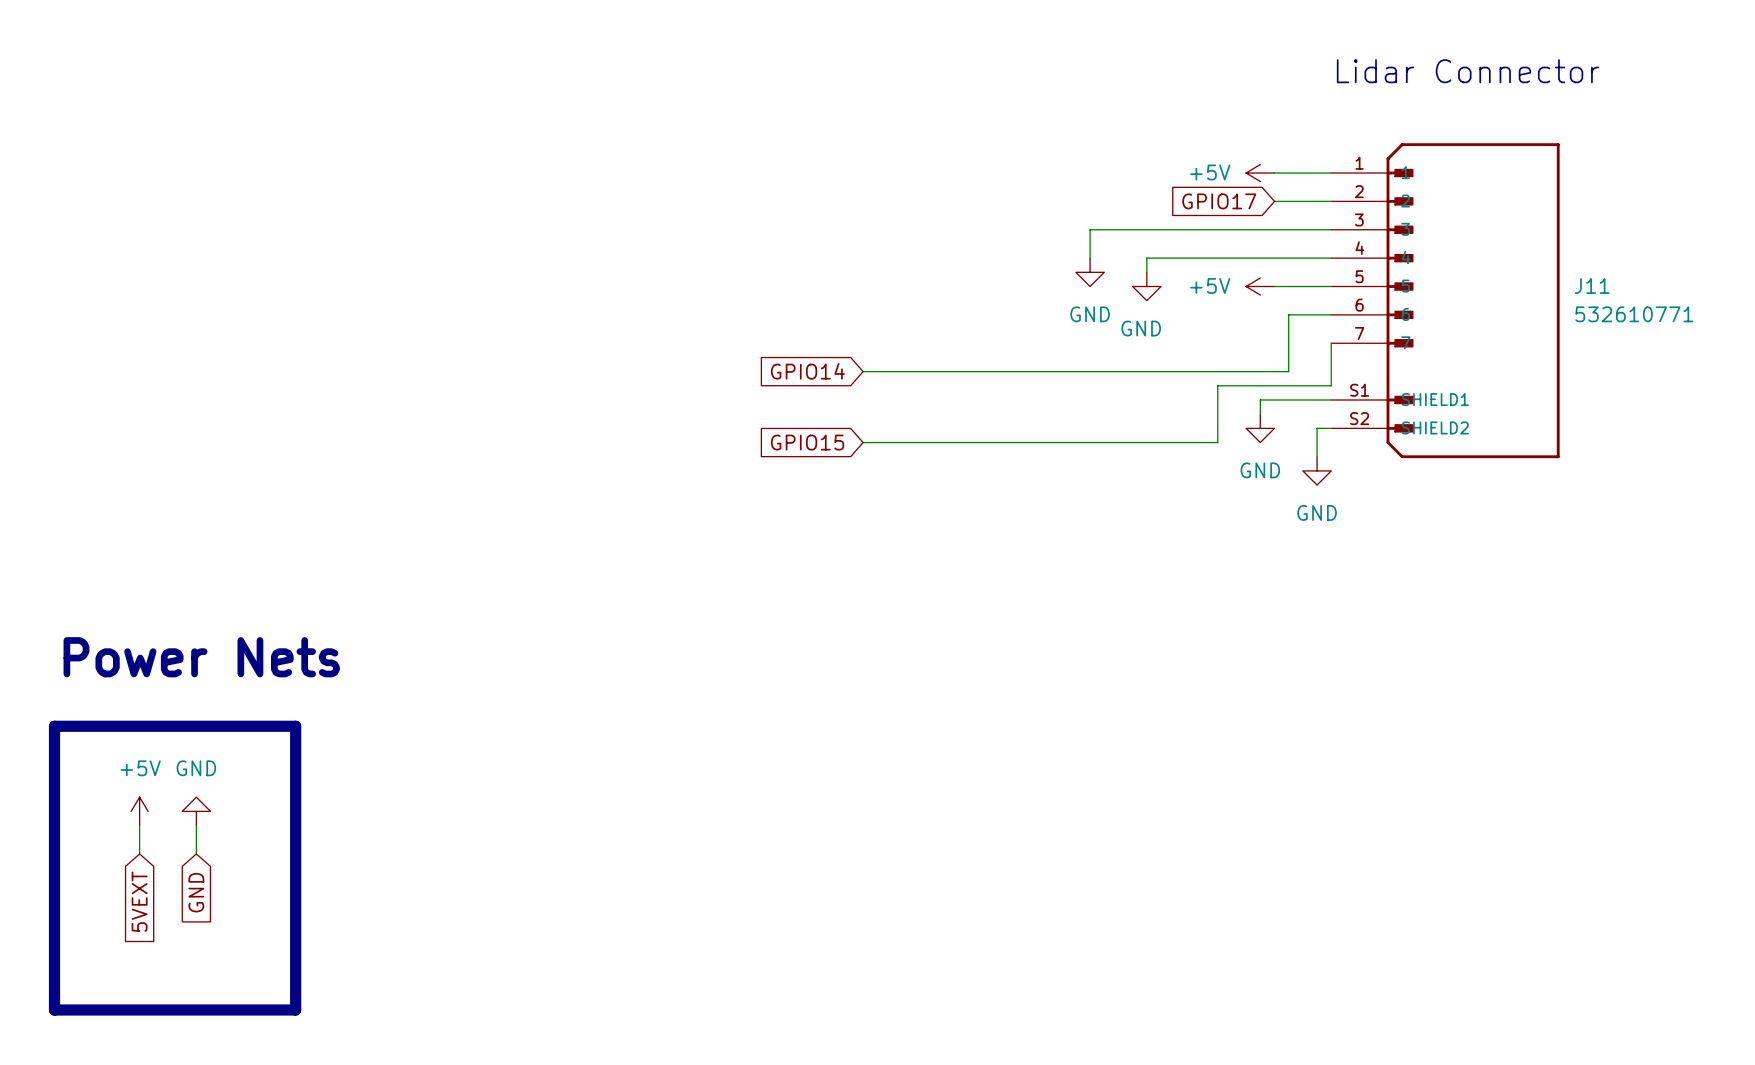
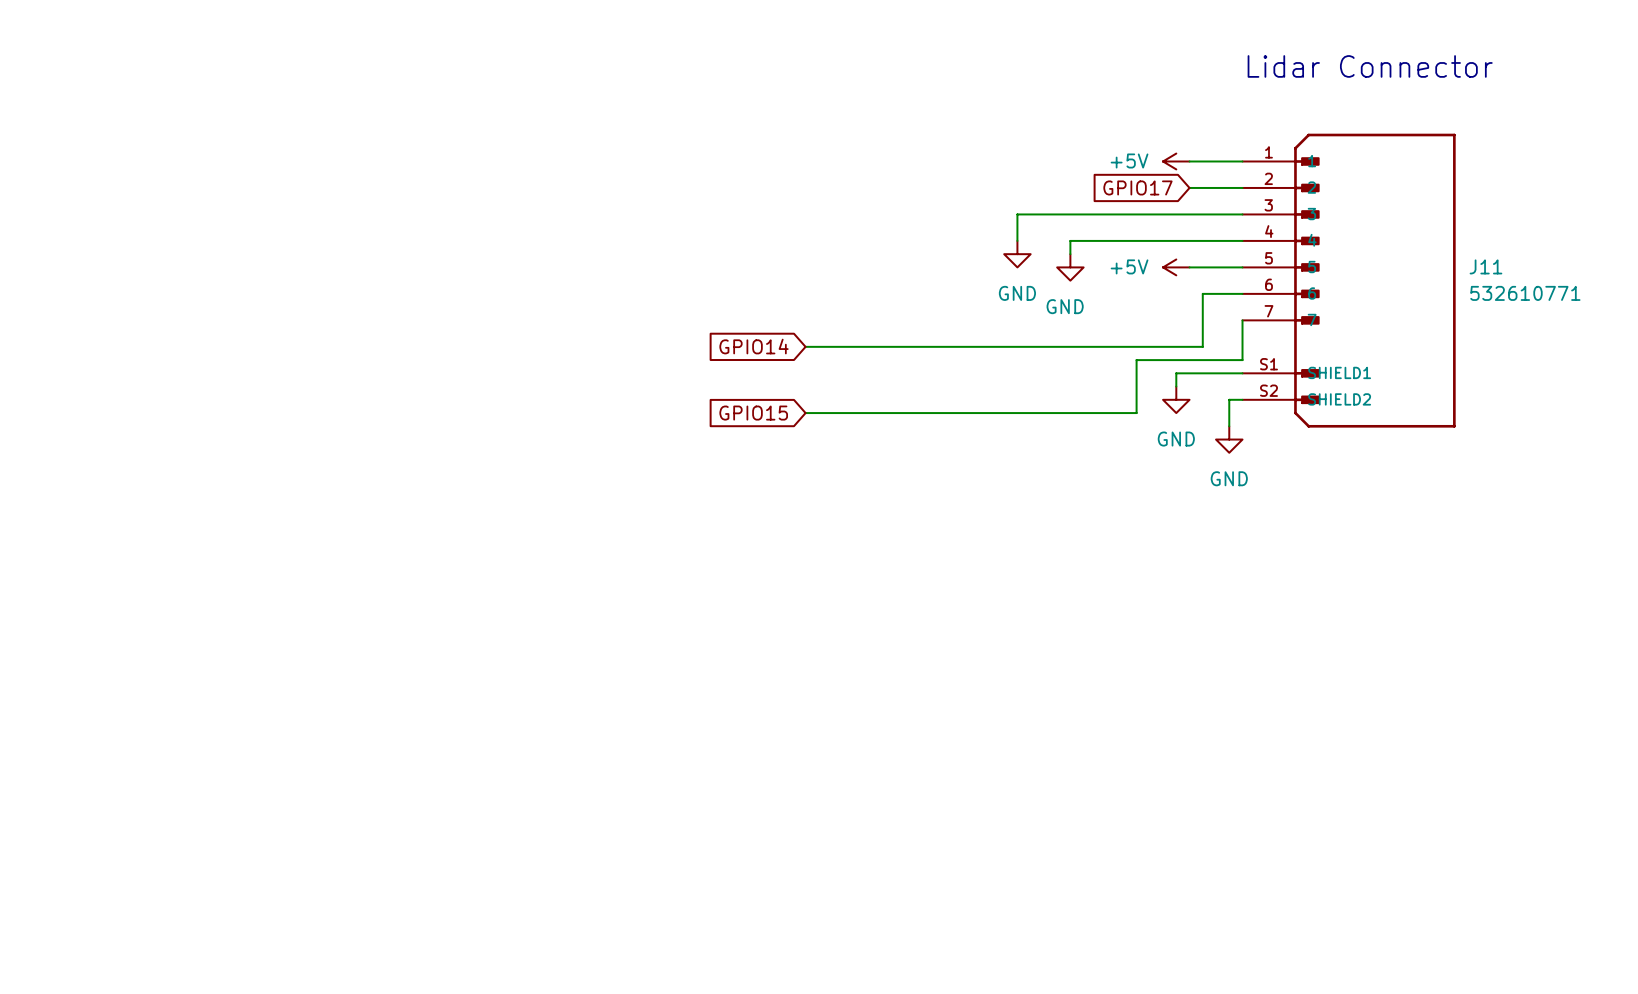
text: Power Nets (201, 657) -> none
line: (54, 726) (295, 726) (295, 1010) (54, 1010) (54, 726) -> none
power symbol: +5V (139, 811) -> none
power symbol: GND (196, 811) -> none
wire: (139, 825) (139, 853) -> none
wire: (196, 825) (196, 853) -> none
global label: GND (196, 892) -> none
global label: 5VEXT (139, 901) -> none

